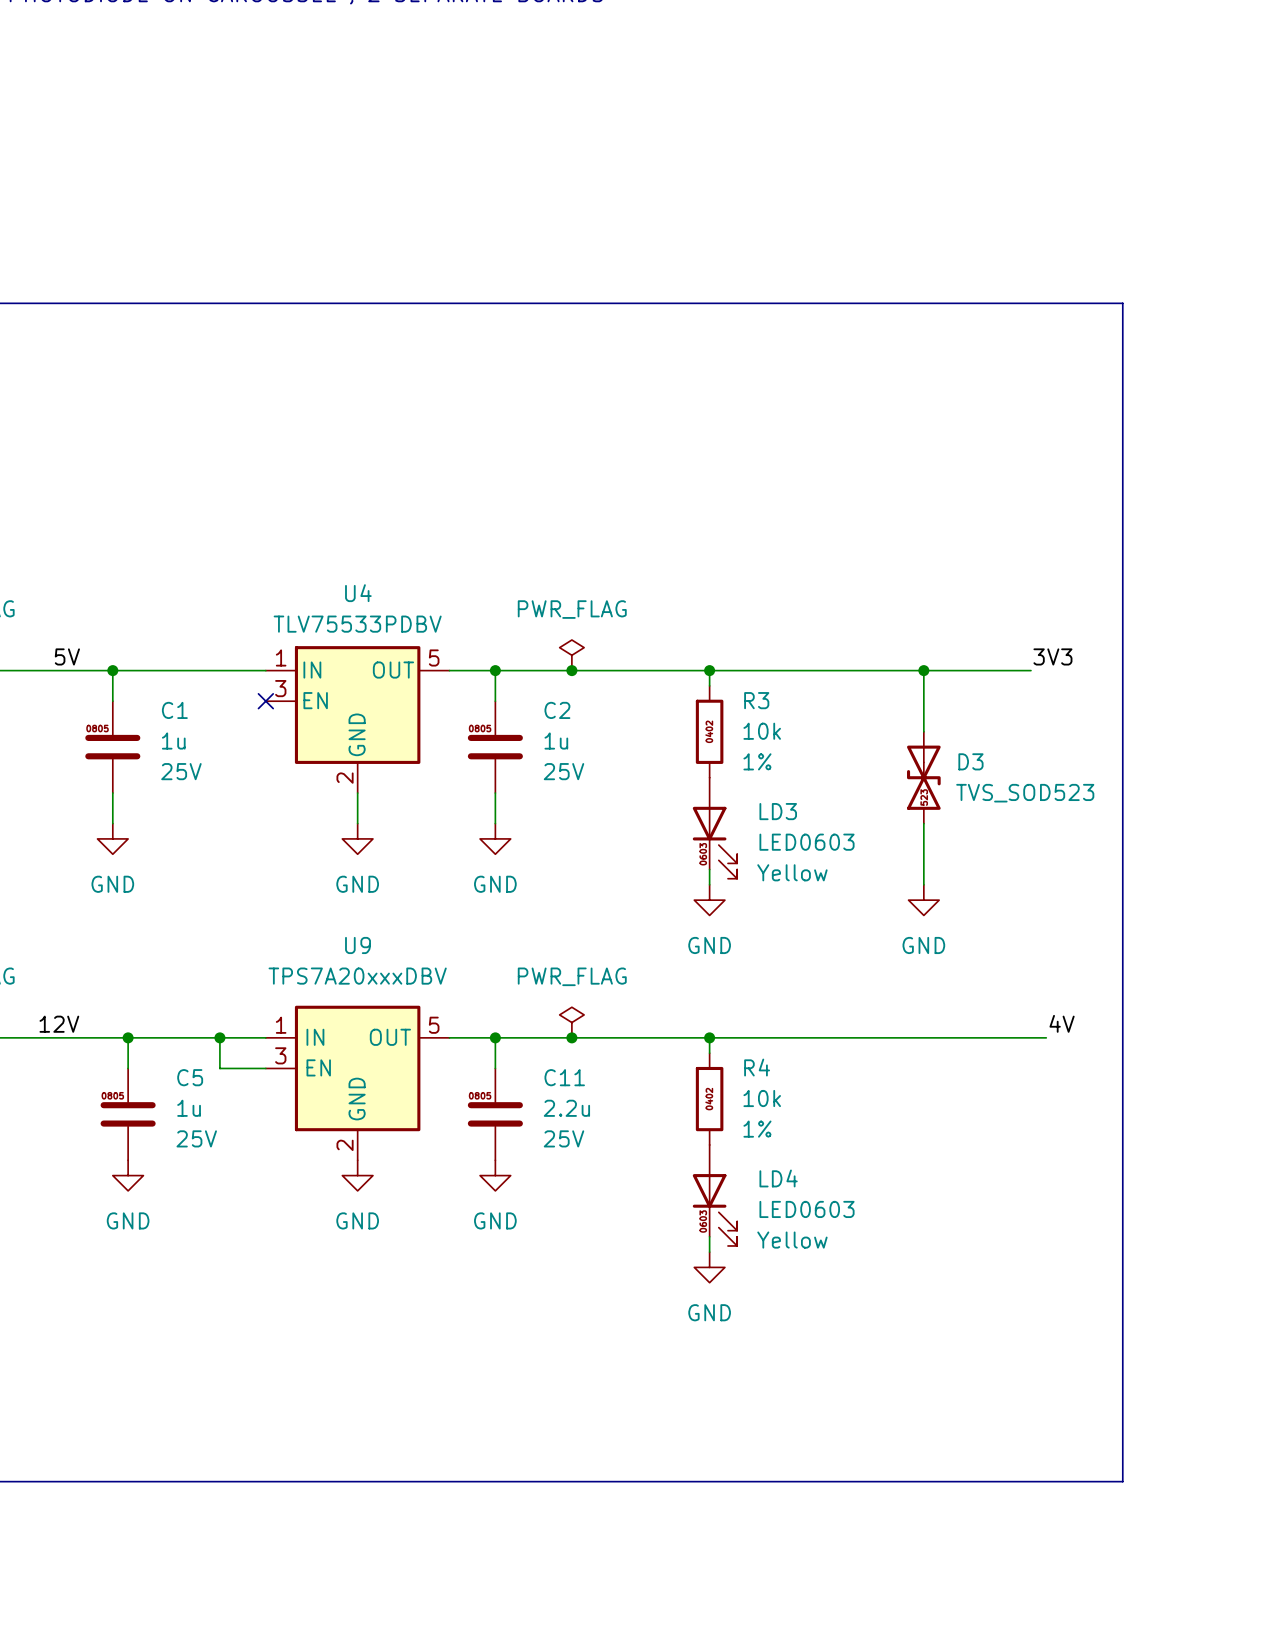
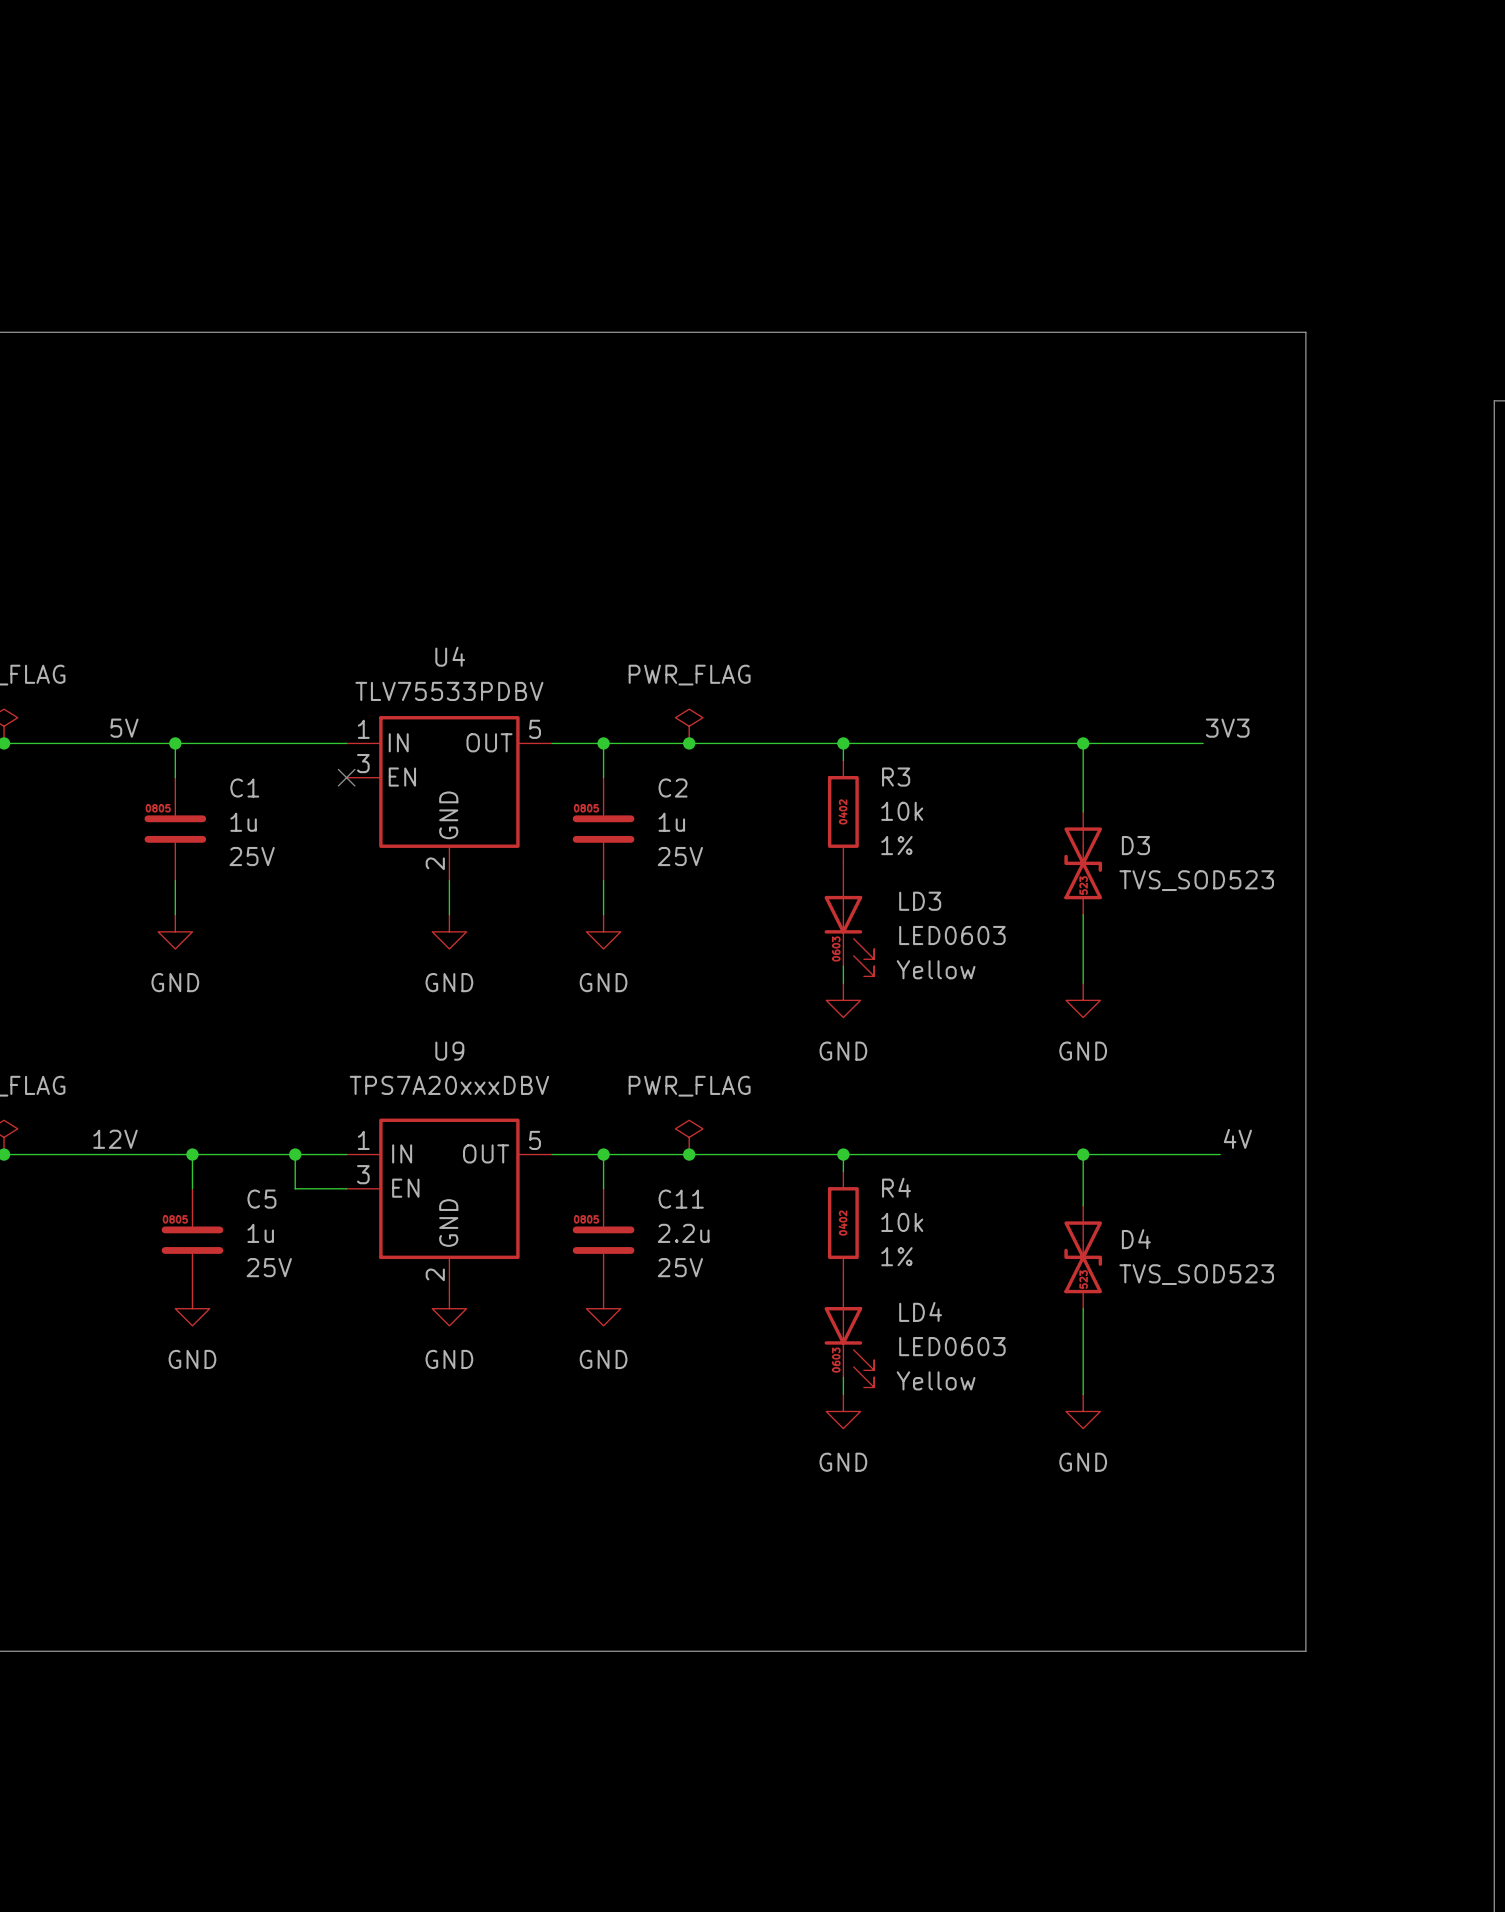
wire: none -> (1083, 1154) (1083, 1205)
junction: none -> (1083, 1154)
D4: none -> TVS_SOD523 (1083, 1257)
wire: none -> (1083, 1308) (1083, 1394)
power symbol: none -> GND (1083, 1411)

